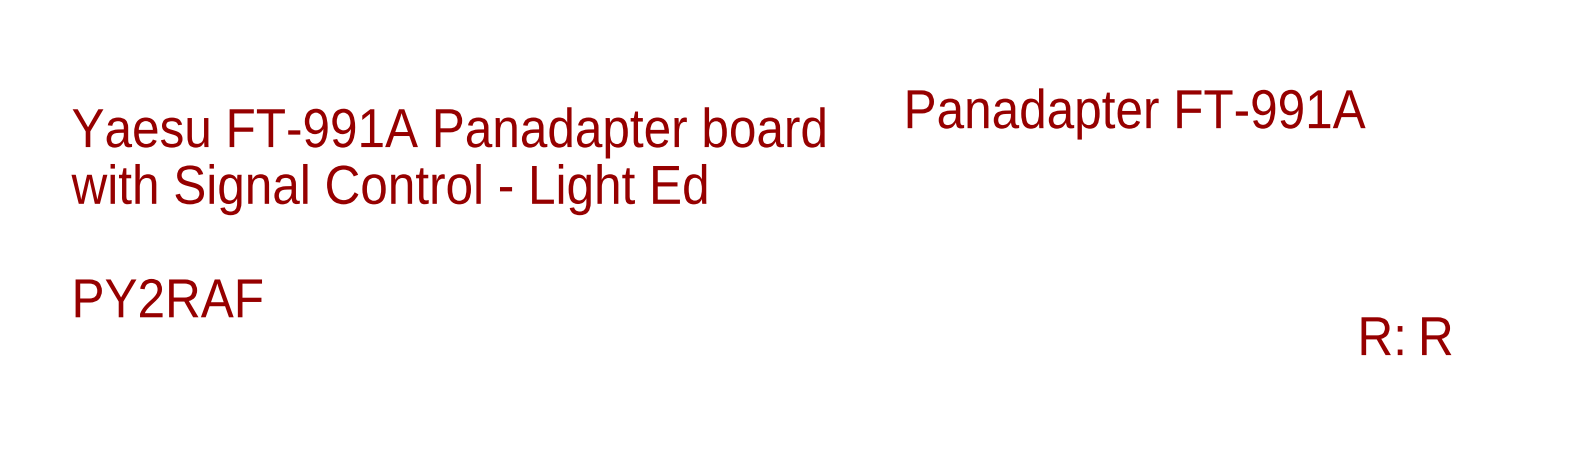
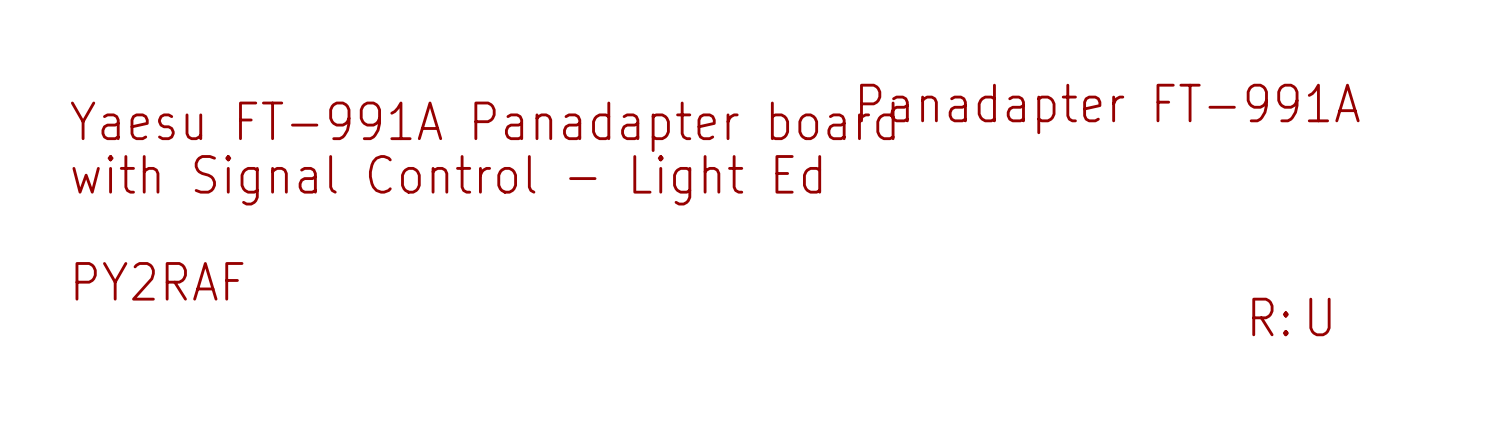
text position: R: (1381, 336) -> R: (1270, 316)
text: none -> U (1319, 316)
text: R (1436, 336) -> none

